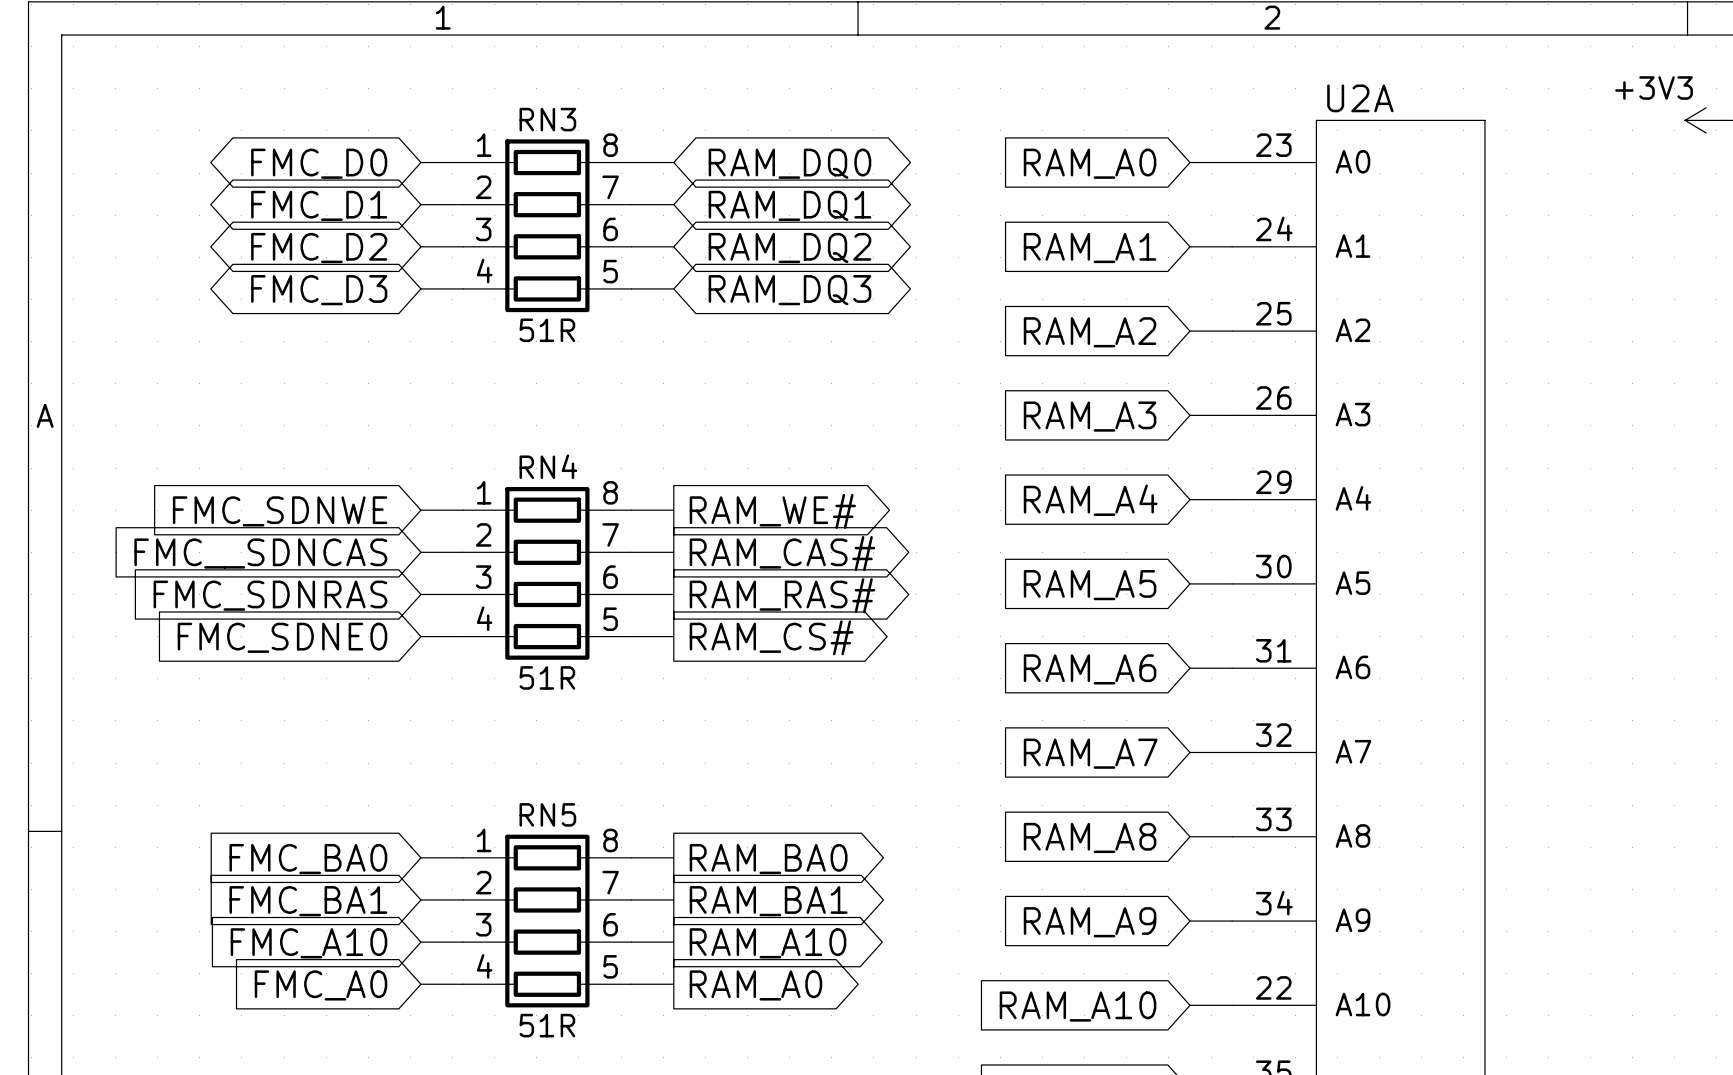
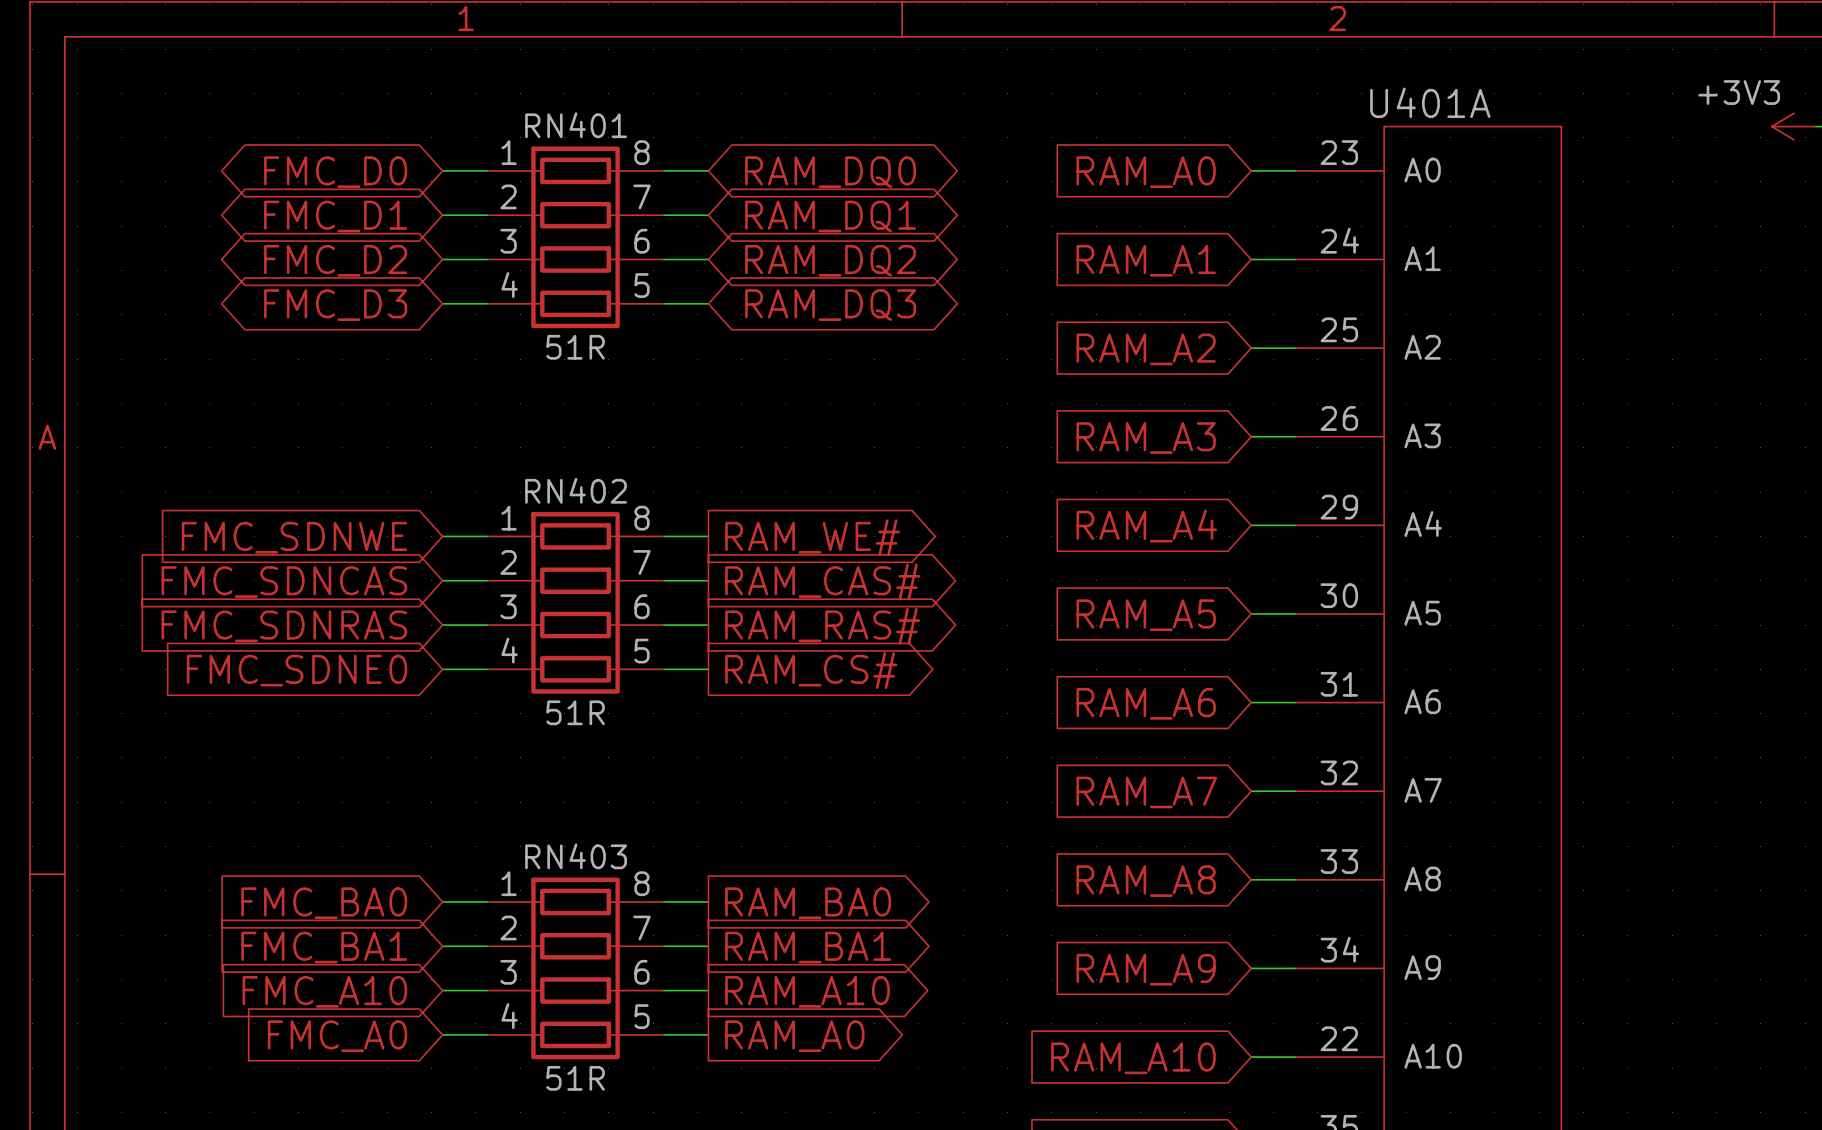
U2A name: U2A (1360, 98) -> U401A (1430, 102)
RN3 name: RN3 (547, 119) -> RN401 (576, 125)
RN4 name: RN4 (548, 466) -> RN402 (576, 490)
global label: FMC__SDNCAS (260, 553) -> FMC_SDNCAS (284, 582)
RN5 name: RN5 (547, 814) -> RN403 (576, 856)

